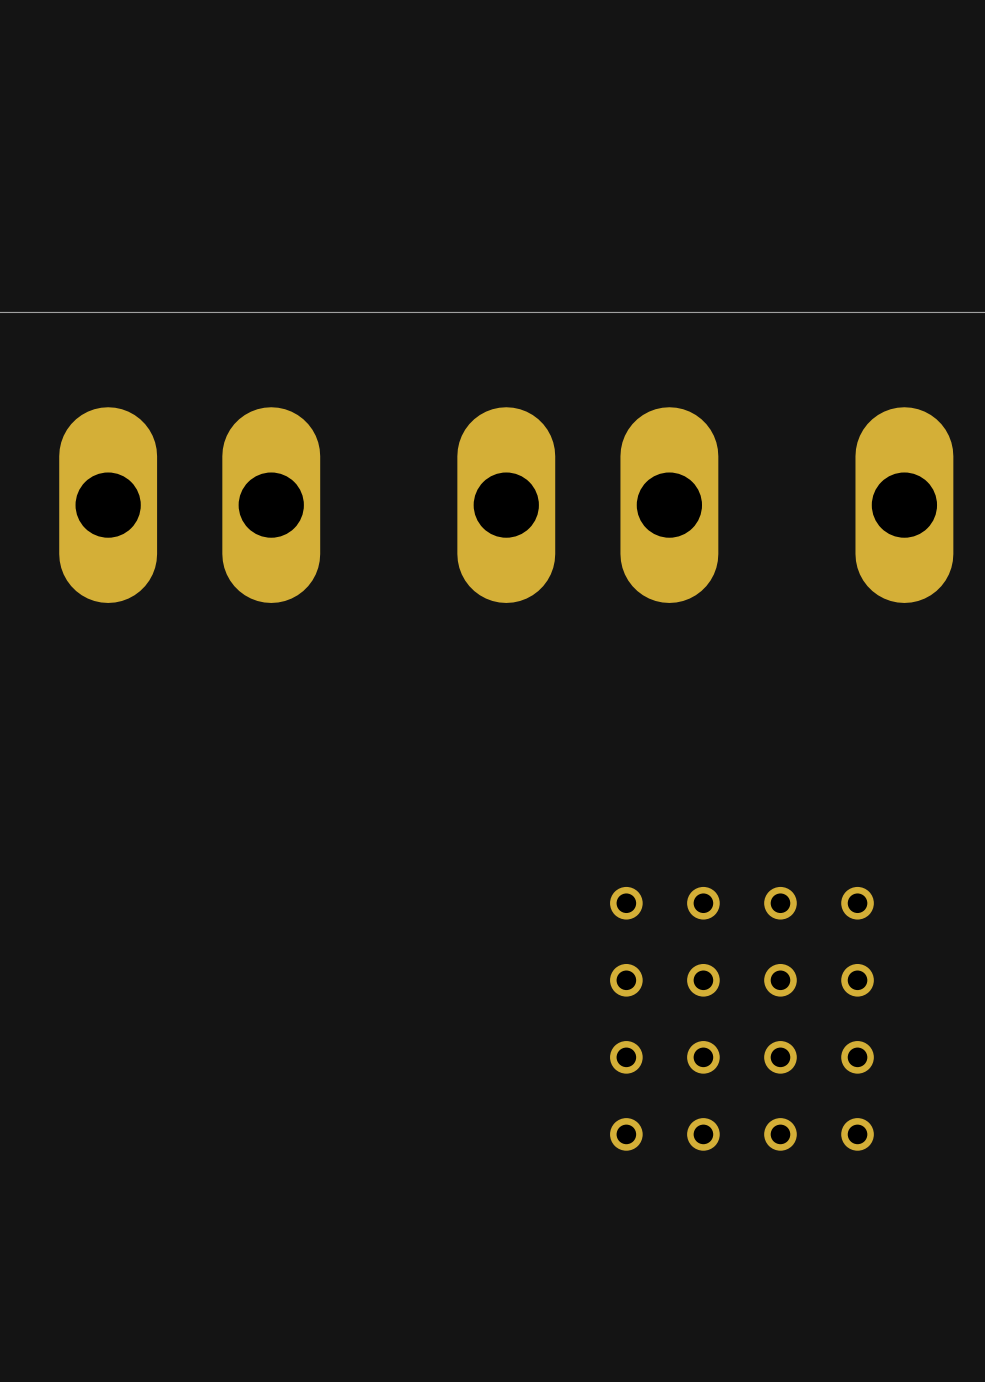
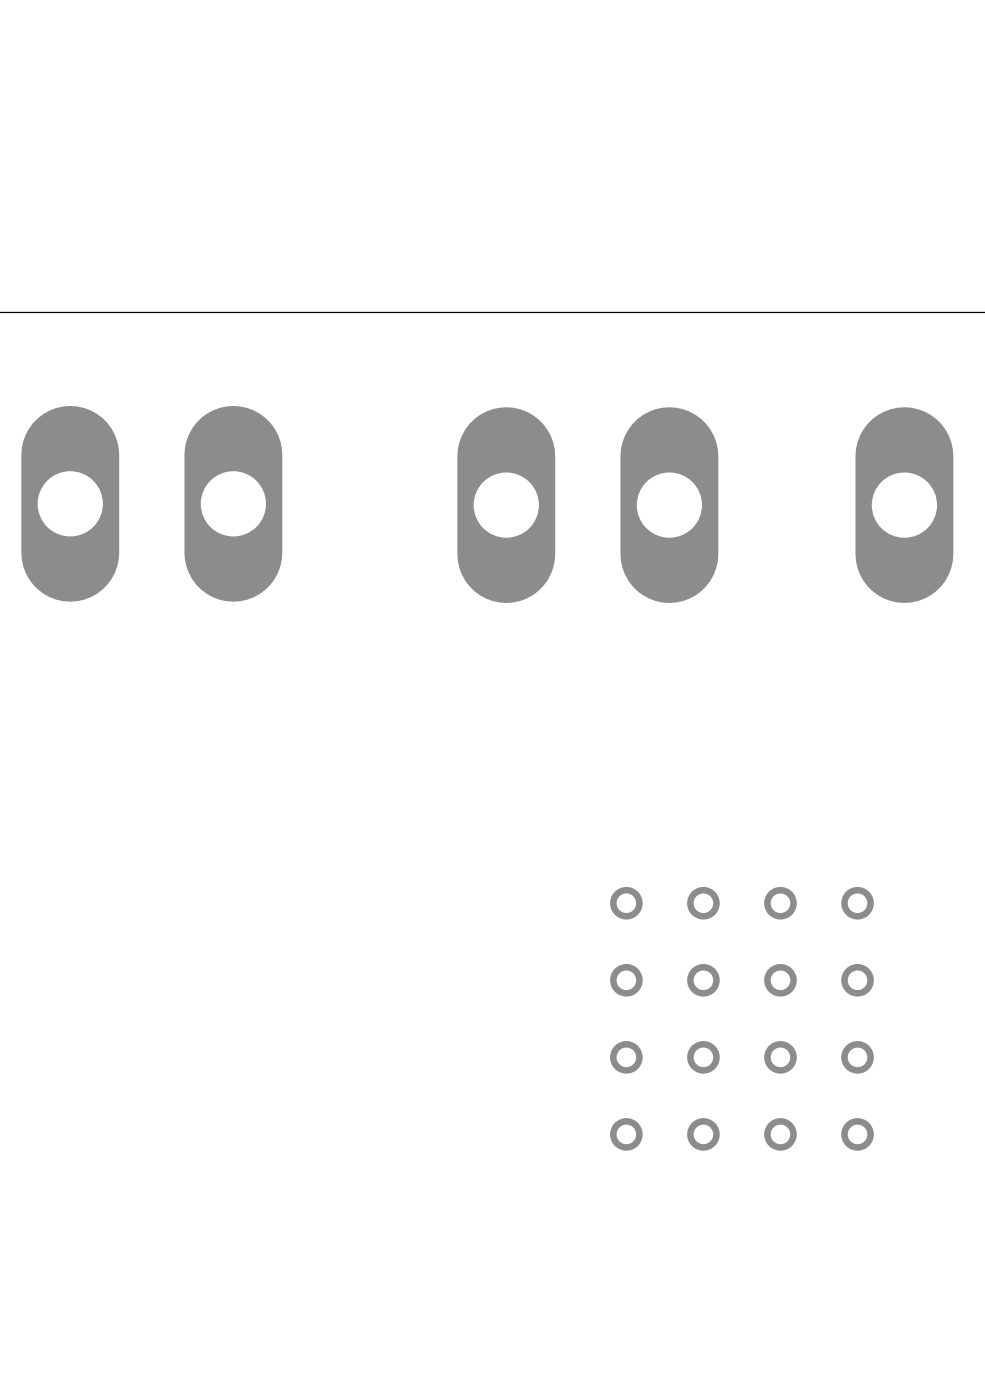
part position: (189, 505) -> (151, 503)

